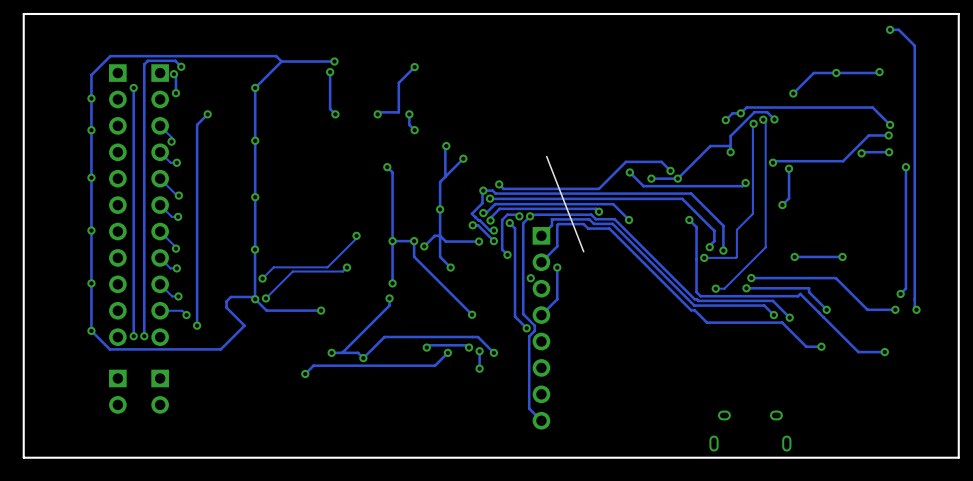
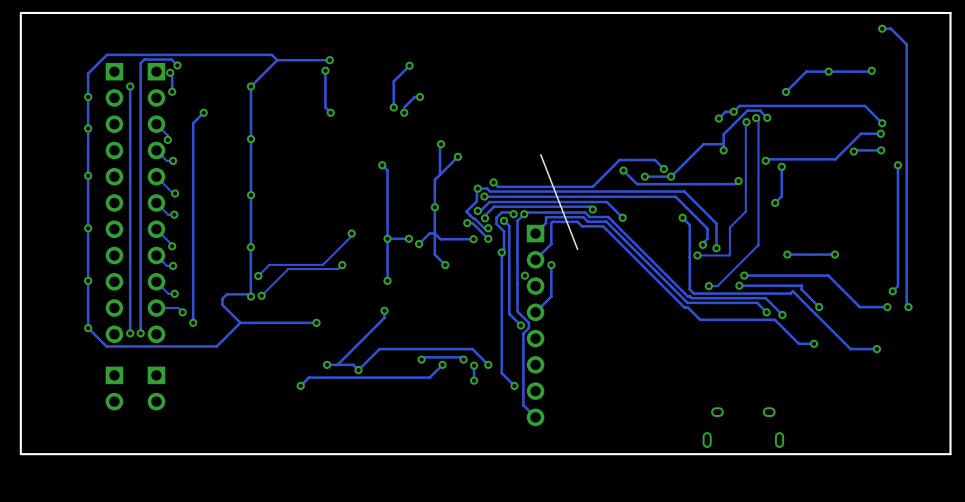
track: none -> (420, 96) (414, 96) (404, 107)
via: none -> (420, 96)
track: (398, 109) (398, 112) (379, 112) (377, 114) -> none
via: none -> (393, 107)
via: (377, 114) -> none
track: (409, 114) (409, 124) (414, 130) -> none
via: (414, 130) -> none
track: (502, 226) (502, 249) (507, 254) -> (496, 223) (504, 231) (504, 249) (501, 251) (501, 373) (514, 385)
track: (414, 241) (414, 256) (472, 314) -> none
track: (389, 298) (389, 305) (342, 352) -> (384, 310) (384, 317) (337, 364)
via position: (389, 298) -> (384, 310)
track: (255, 299) (266, 310) (321, 310) -> none
via: (321, 310) -> none
via: (472, 314) -> none
track: none -> (316, 322) (240, 322)
via: none -> (316, 322)
via: (426, 347) -> none
track: (469, 347) (466, 345) (429, 345) (426, 347) -> (463, 359) (461, 357) (423, 357) (421, 359)
via: (469, 347) -> none
track: (479, 351) (479, 366) -> (474, 365) (474, 380)
via: (479, 351) -> none
via: (331, 352) -> none
track: (447, 352) (435, 365) (313, 365) (305, 373) -> (442, 364) (429, 377) (309, 377) (300, 385)
via: (447, 352) -> none
track: (493, 352) (478, 337) (384, 337) (363, 358) (358, 352) (331, 352) -> (488, 364) (472, 349) (379, 349) (358, 370) (353, 364) (327, 364)
via: (493, 352) -> none
via position: (363, 358) -> (358, 370)
via: none -> (421, 359)
via: none -> (463, 359)
via: none -> (327, 364)
via: none -> (442, 364)
via: none -> (488, 364)
via: (305, 373) -> none
via: none -> (474, 380)
via: none -> (300, 385)
via: none -> (514, 385)

